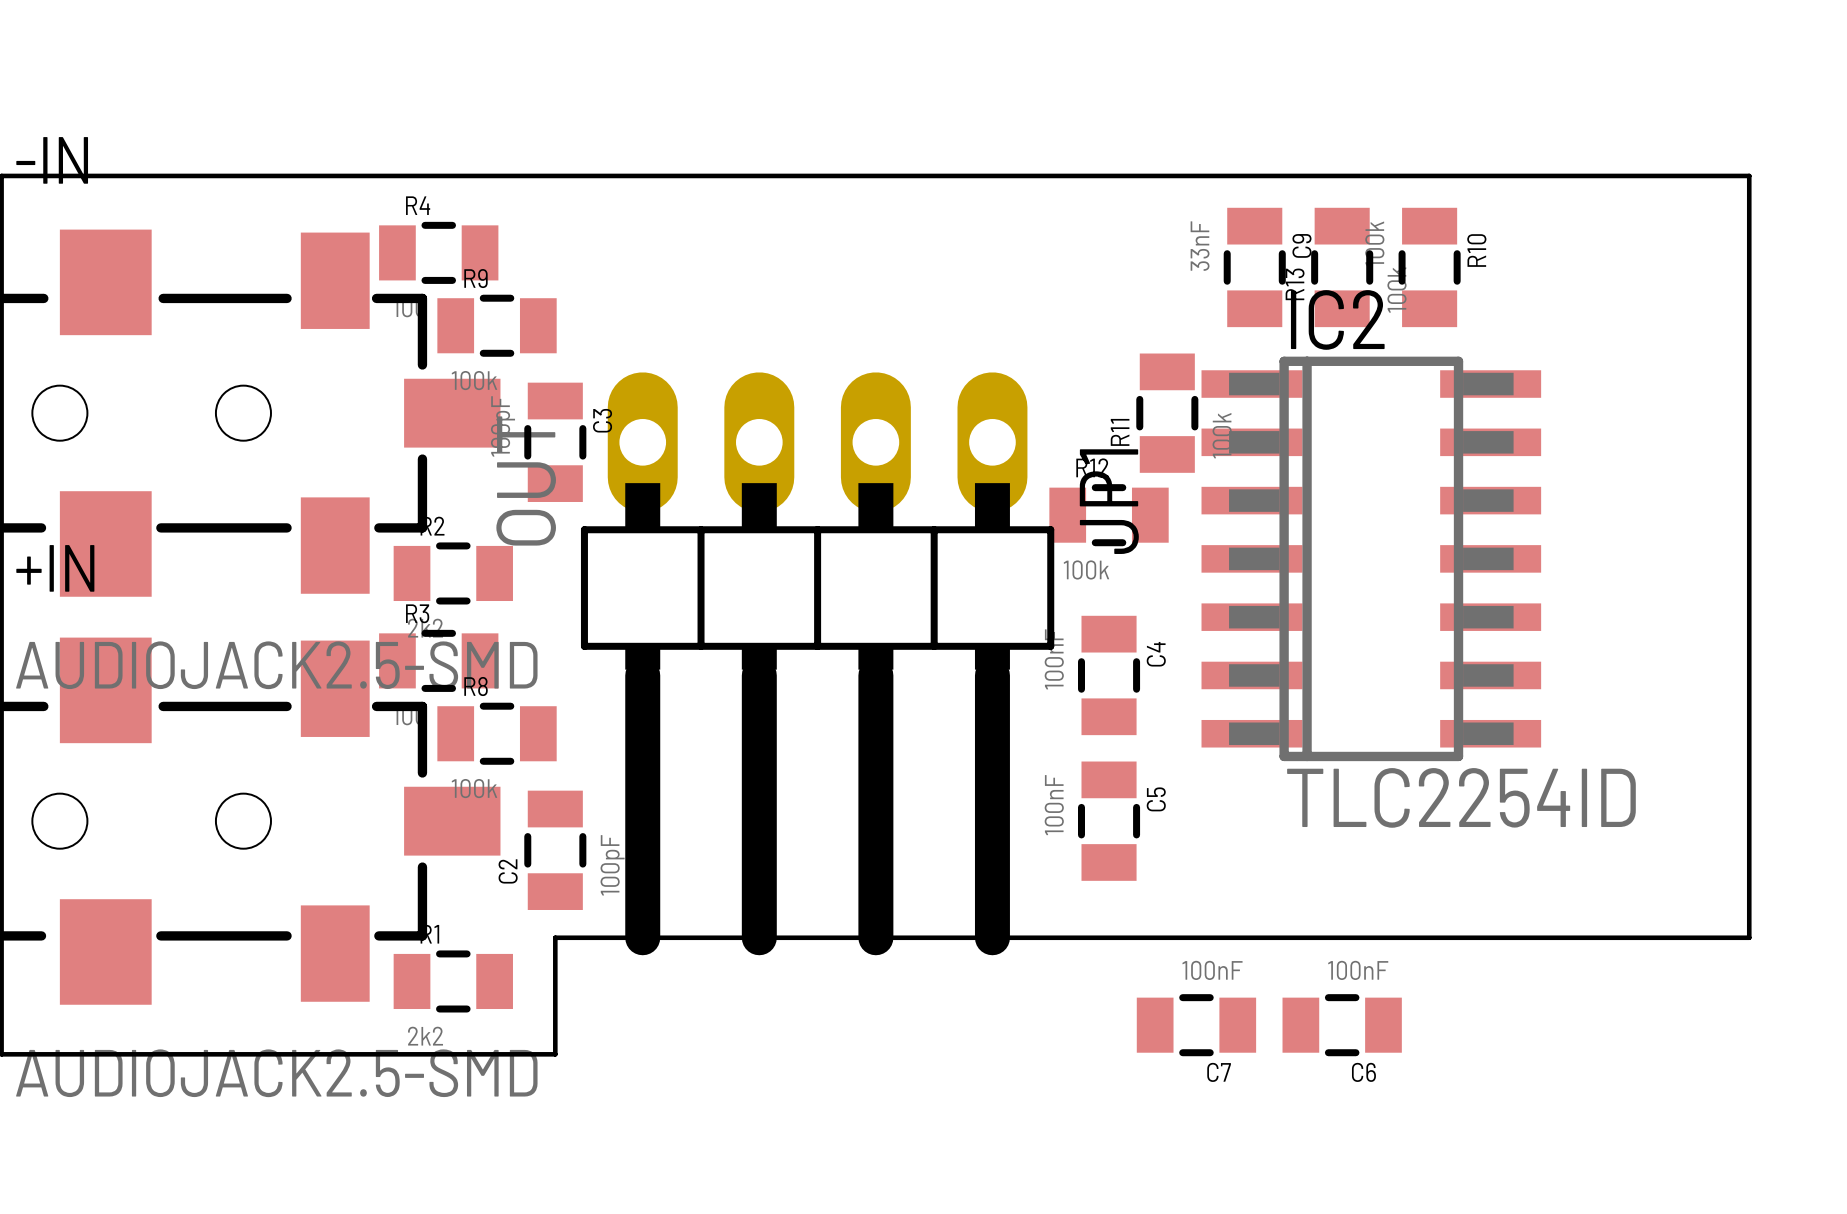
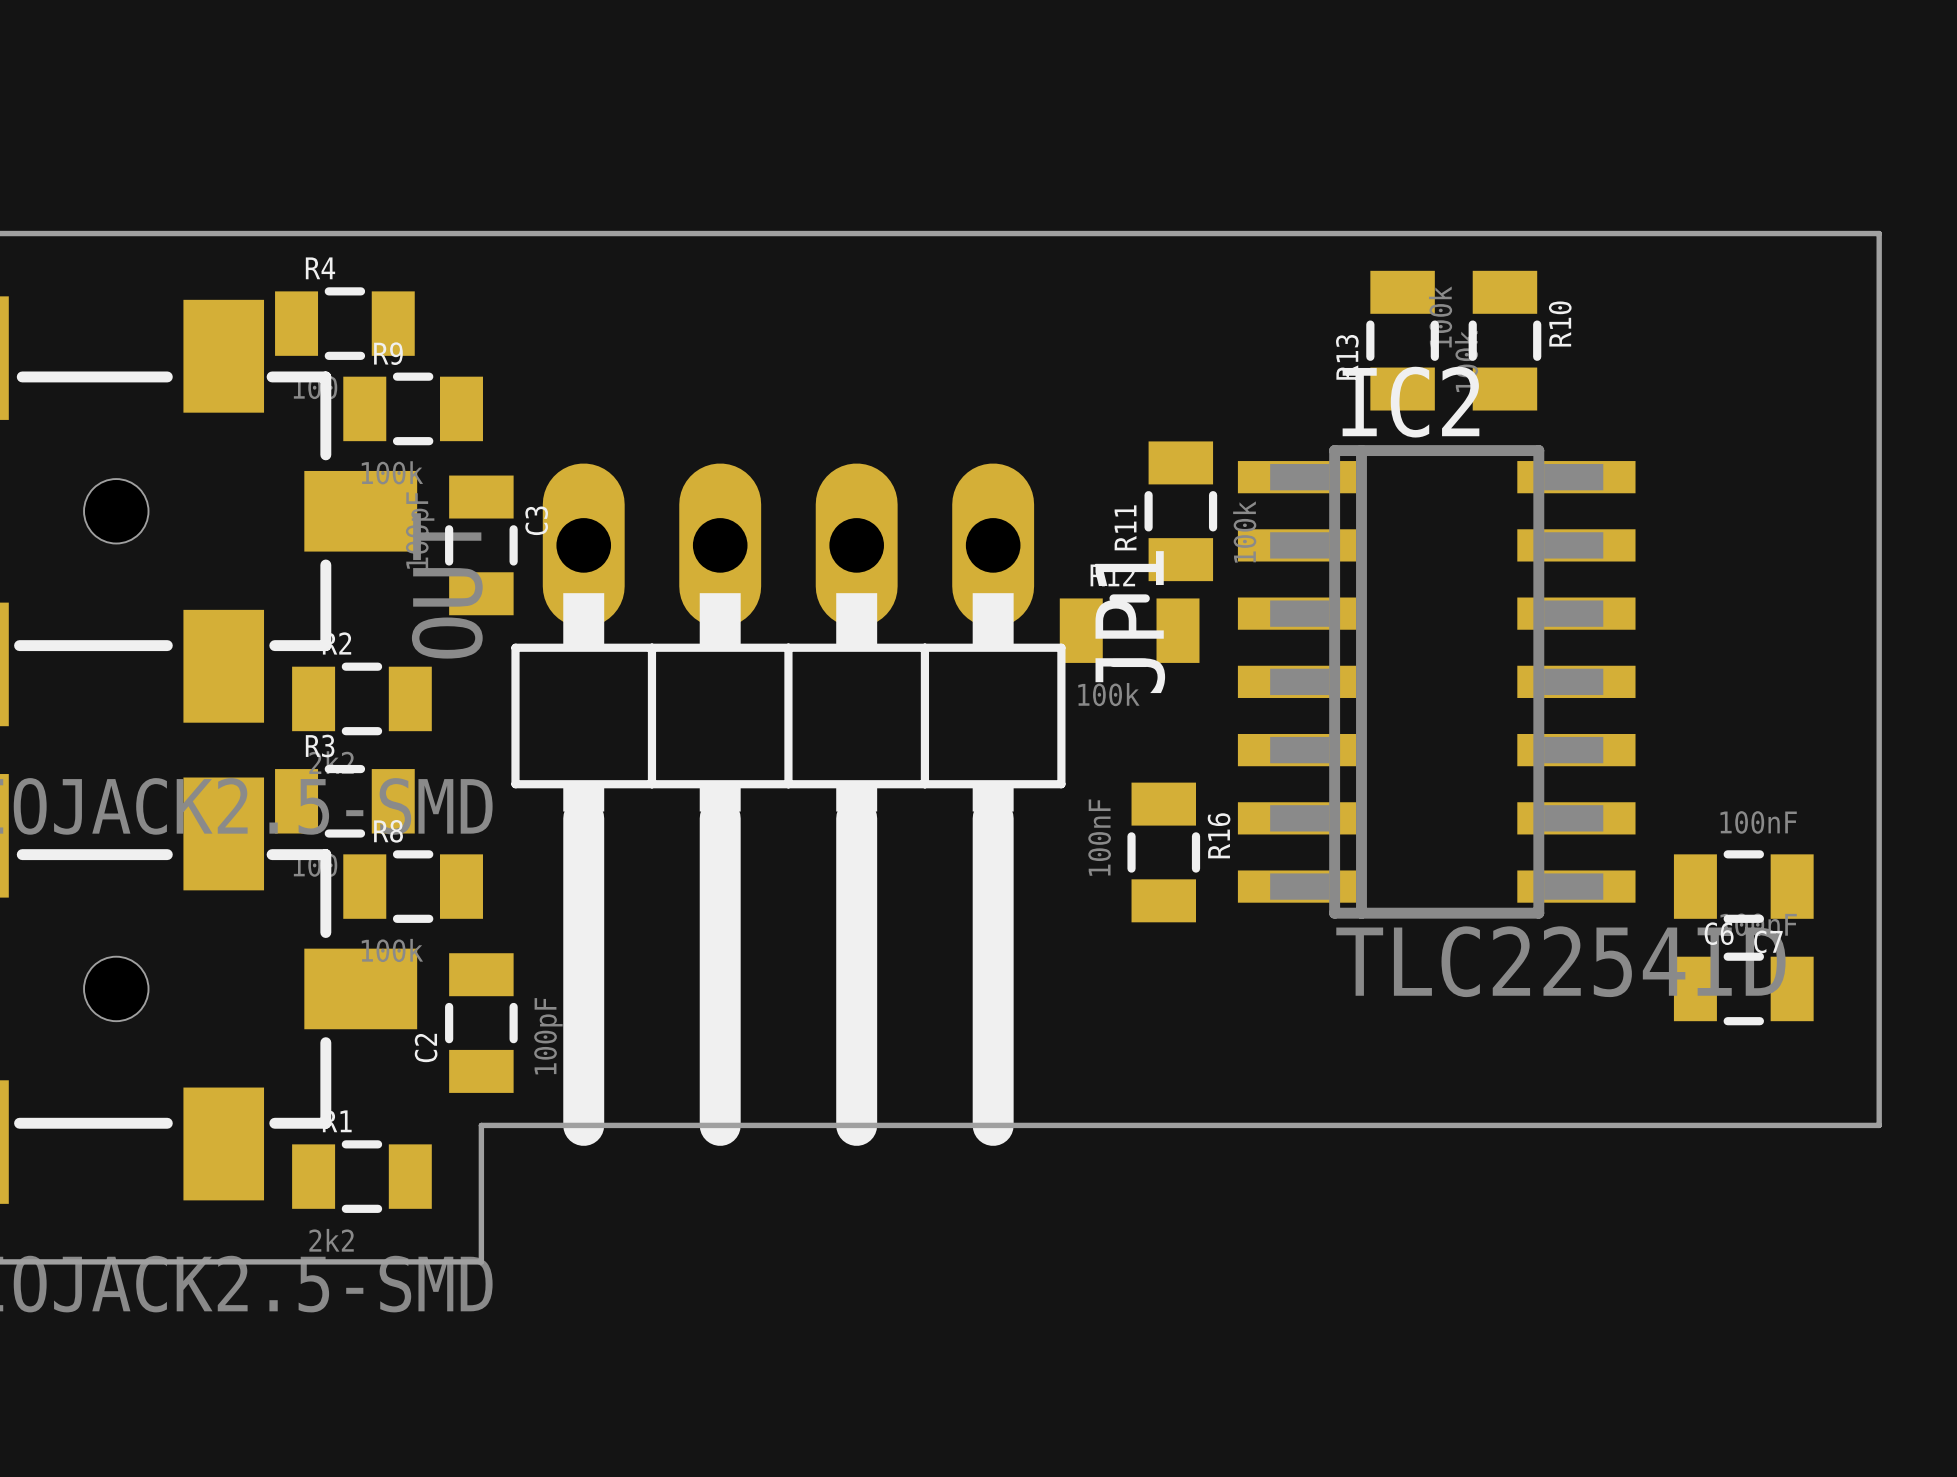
C9: 33nF (1254, 267) -> none
R11 position: (1167, 413) -> (1180, 511)
C4 name: C4 (1156, 654) -> R16 (1219, 835)
C4 position: (1109, 675) -> (1163, 852)
C5: 100nF (1109, 821) -> none
C7 position: (1196, 1025) -> (1743, 886)
C6 position: (1342, 1025) -> (1743, 988)
C6 name position: C6 (1363, 1072) -> C6 (1719, 933)

